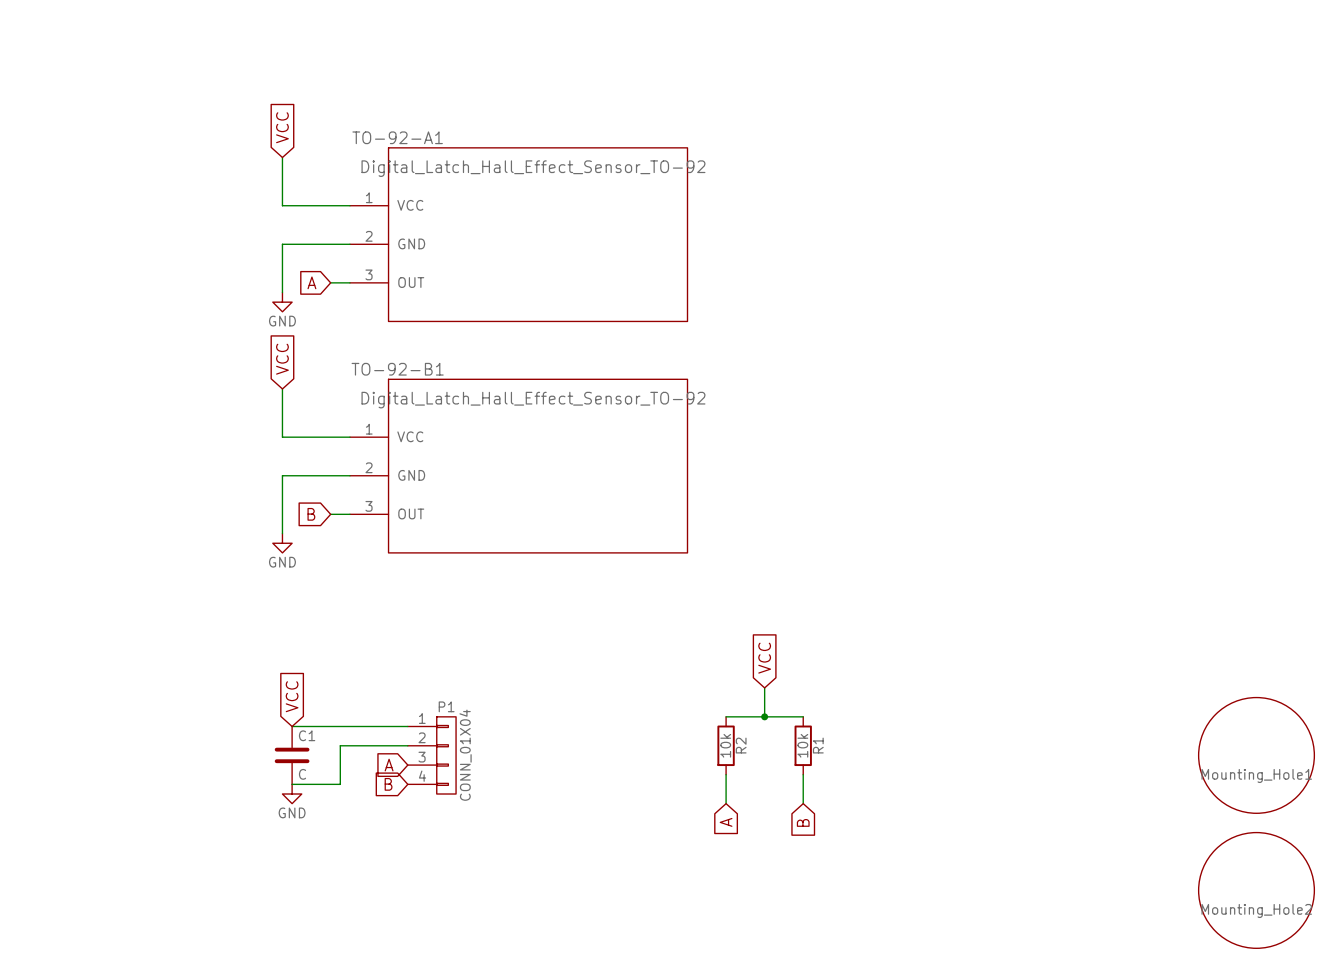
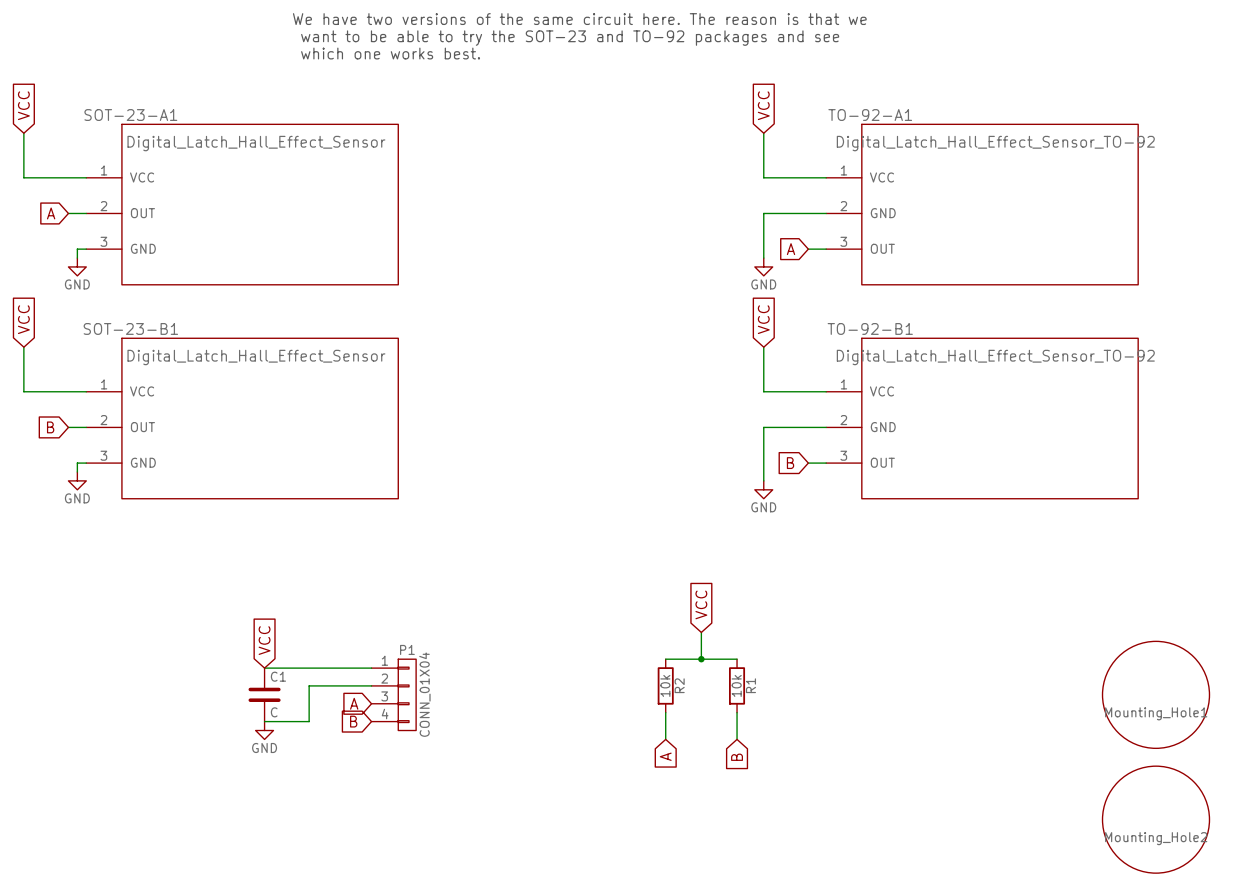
text: none -> We have two versions of the same circuit here. The reason is that we (579, 19)
text: none -> want to be able to try the SOT-23 and TO-92 packages and see (570, 38)
text: none -> which one works best. (390, 53)
global label: none -> VCC (23, 105)
global label: none -> VCC (763, 105)
global label: VCC (282, 127) -> none
wire: none -> (23, 133) (23, 177) (86, 177)
wire: none -> (763, 133) (763, 177) (826, 177)
wire: (282, 157) (282, 205) (349, 205) -> none
SOT-23-A1: none -> Digital_Latch_Hall_Effect_Sensor (242, 204)
global label: none -> A (51, 213)
wire: none -> (68, 213) (86, 213)
TO-92-A1 position: (518, 234) -> (982, 204)
wire: none -> (826, 213) (763, 213) (763, 258)
wire: (349, 244) (282, 244) (282, 292) -> none
wire: none -> (86, 249) (77, 249) (77, 258)
global label: none -> A (791, 249)
wire: none -> (808, 249) (826, 249)
global label: A (311, 282) -> none
wire: (330, 282) (349, 282) -> none
power symbol: none -> GND (77, 266)
power symbol: none -> GND (763, 266)
power symbol: GND (282, 302) -> none
global label: none -> VCC (23, 319)
global label: none -> VCC (763, 319)
global label: VCC (282, 359) -> none
wire: none -> (23, 347) (23, 391) (86, 391)
wire: none -> (763, 347) (763, 391) (826, 391)
wire: (282, 388) (282, 437) (349, 437) -> none
SOT-23-B1: none -> Digital_Latch_Hall_Effect_Sensor (242, 418)
global label: none -> B (50, 427)
wire: none -> (68, 427) (86, 427)
TO-92-B1 position: (518, 466) -> (982, 418)
wire: none -> (826, 427) (763, 427) (763, 480)
wire: (349, 475) (282, 475) (282, 533) -> none
wire: none -> (86, 463) (77, 463) (77, 471)
global label: none -> B (790, 463)
wire: none -> (808, 463) (826, 463)
global label: B (311, 514) -> none
wire: (330, 514) (349, 514) -> none
power symbol: none -> GND (77, 480)
power symbol: none -> GND (763, 489)
power symbol: GND (282, 543) -> none

